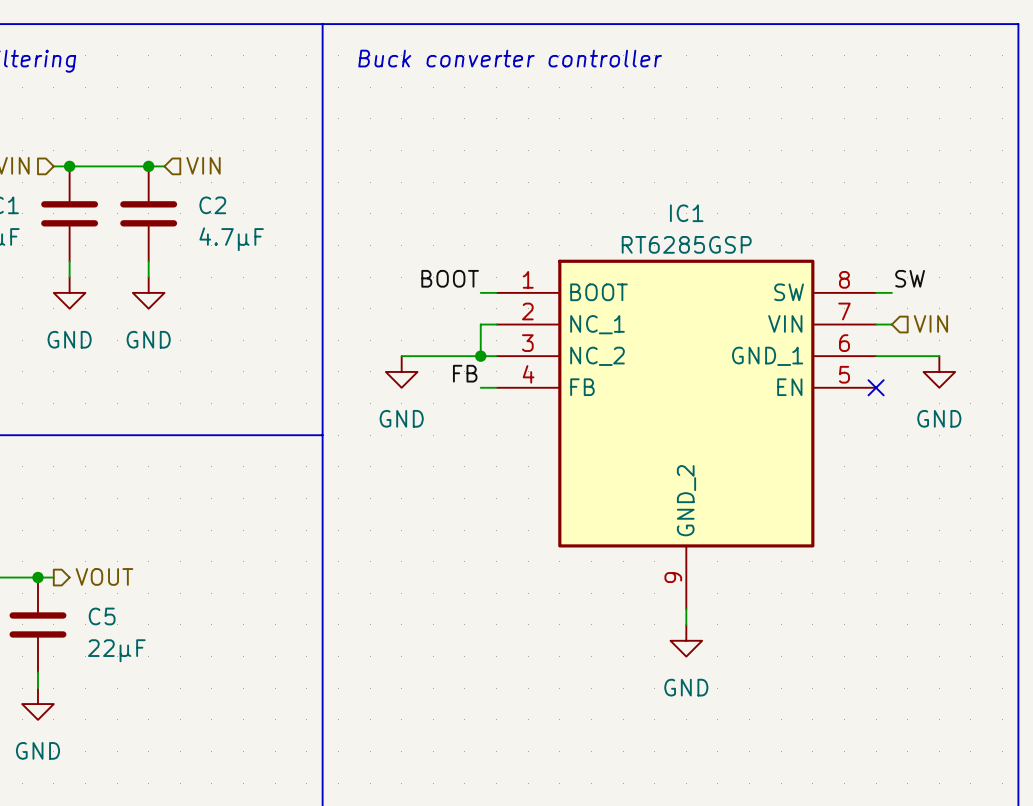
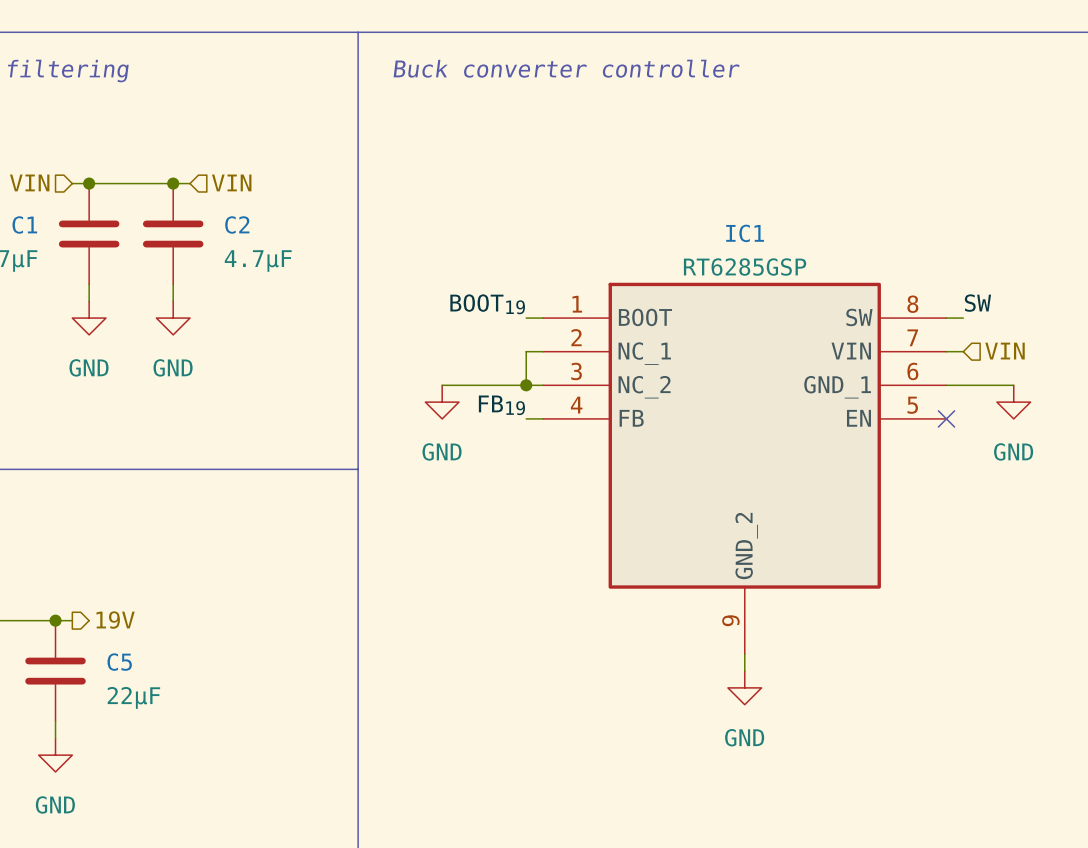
label: BOOT (450, 278) -> BOOT19 (487, 304)
label: FB (465, 373) -> FB19 (501, 405)
hierarchical label: VOUT (104, 576) -> 19V (115, 620)

